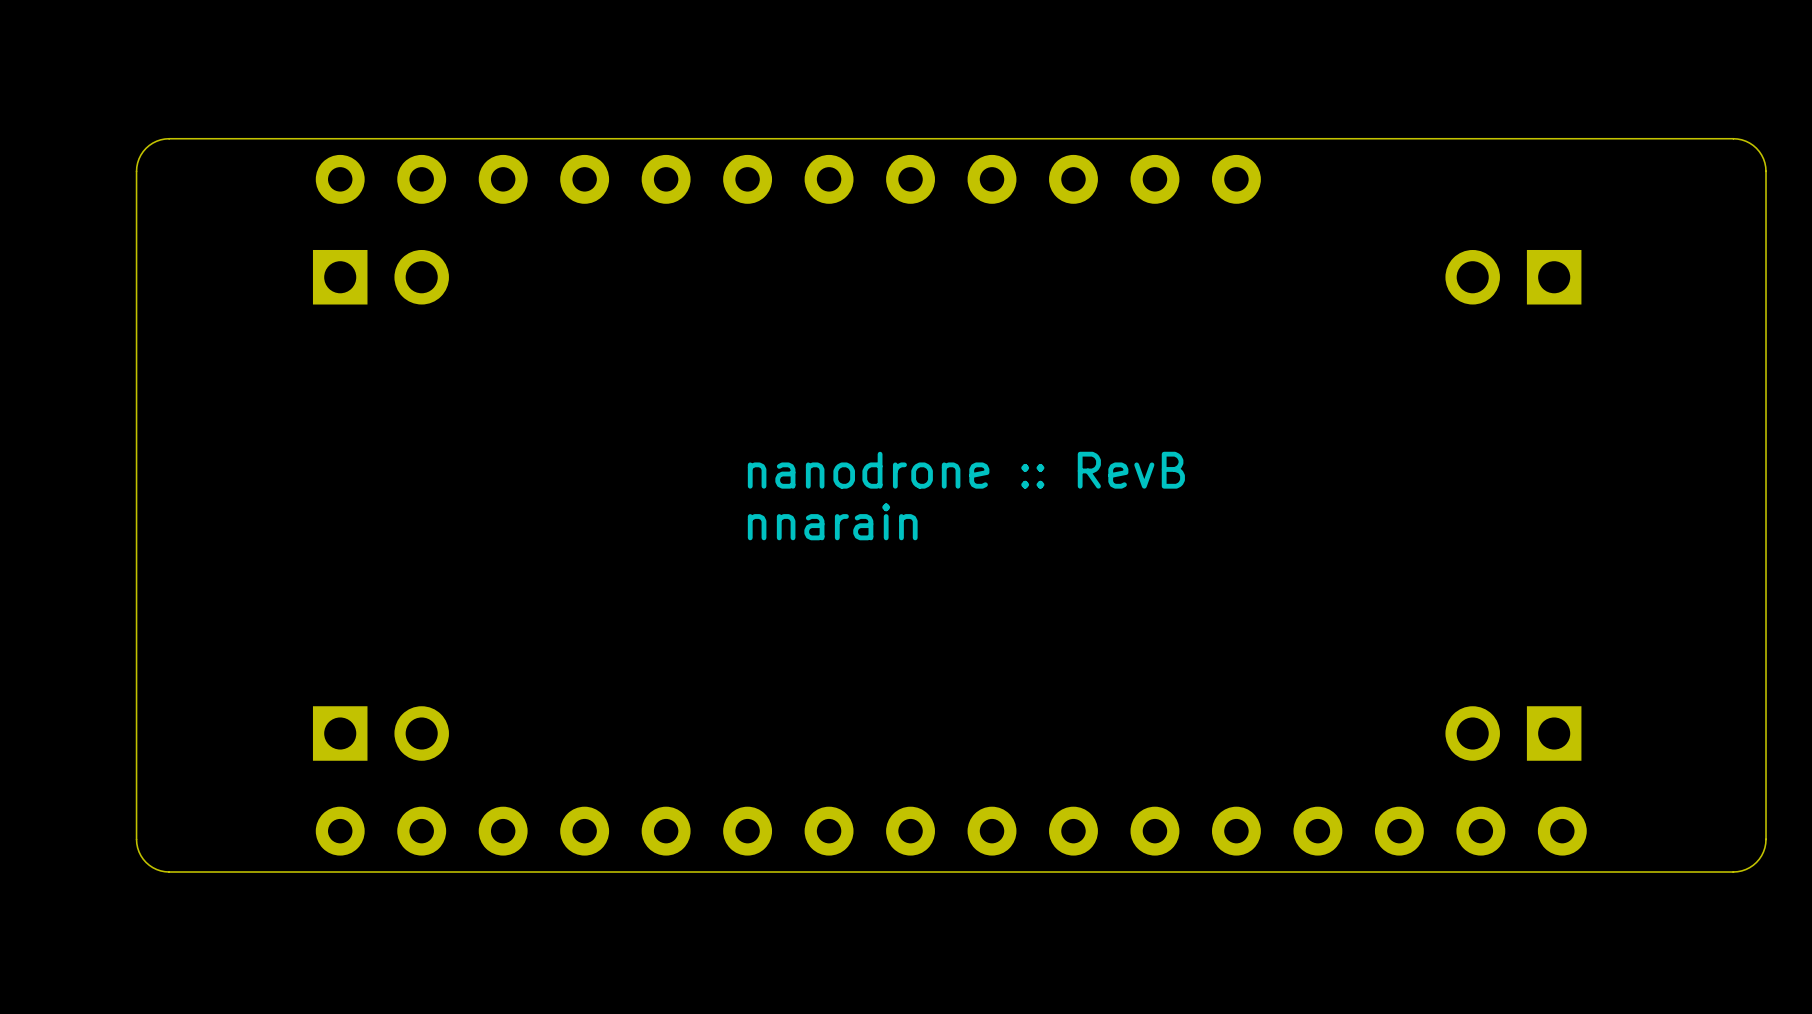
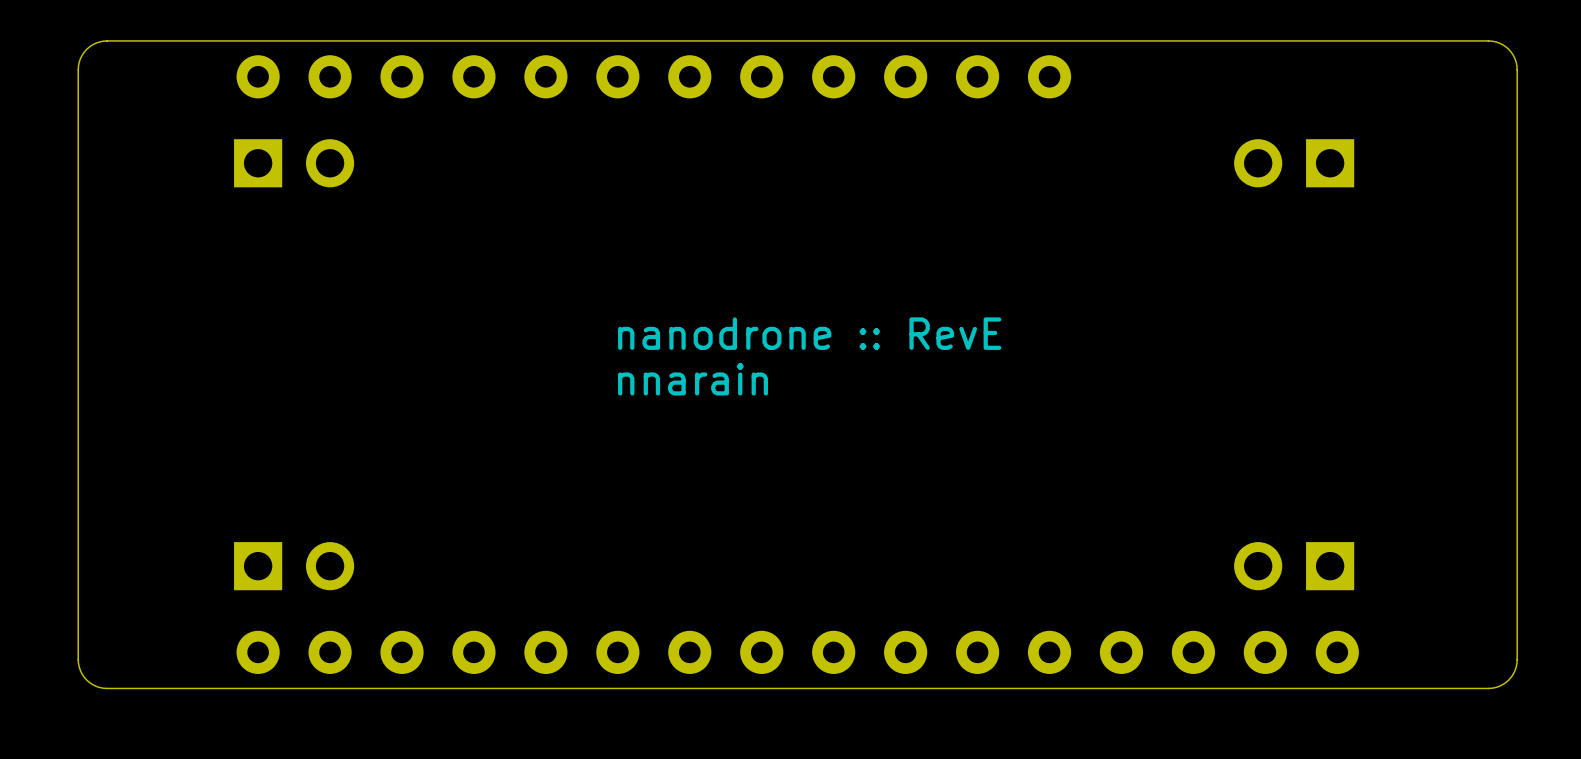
text: nanodrone :: RevB (966, 470) -> nanodrone :: RevE (809, 333)

